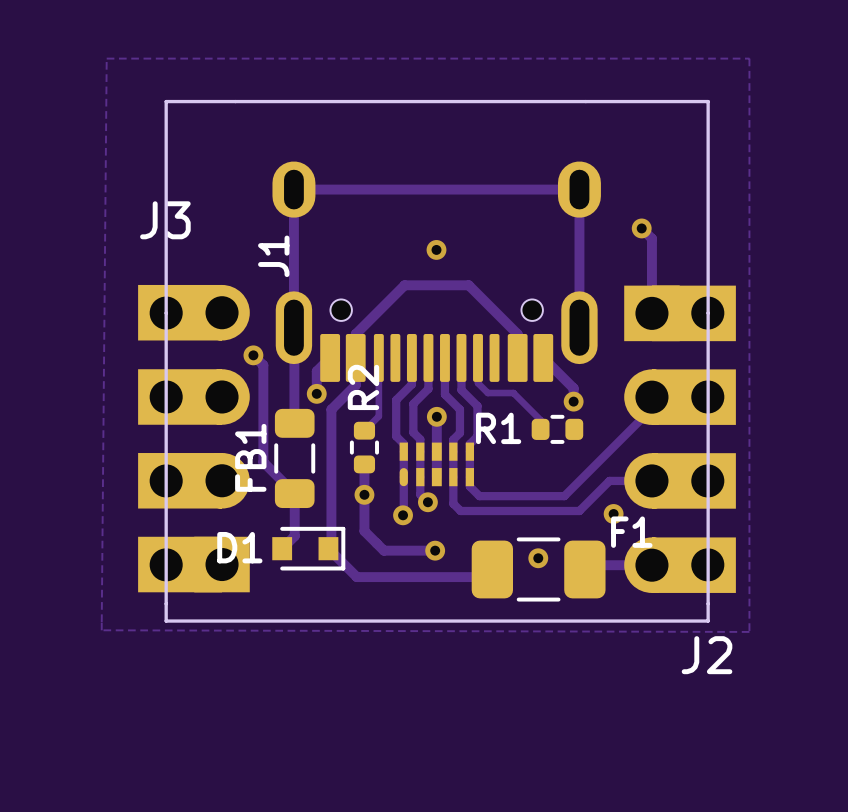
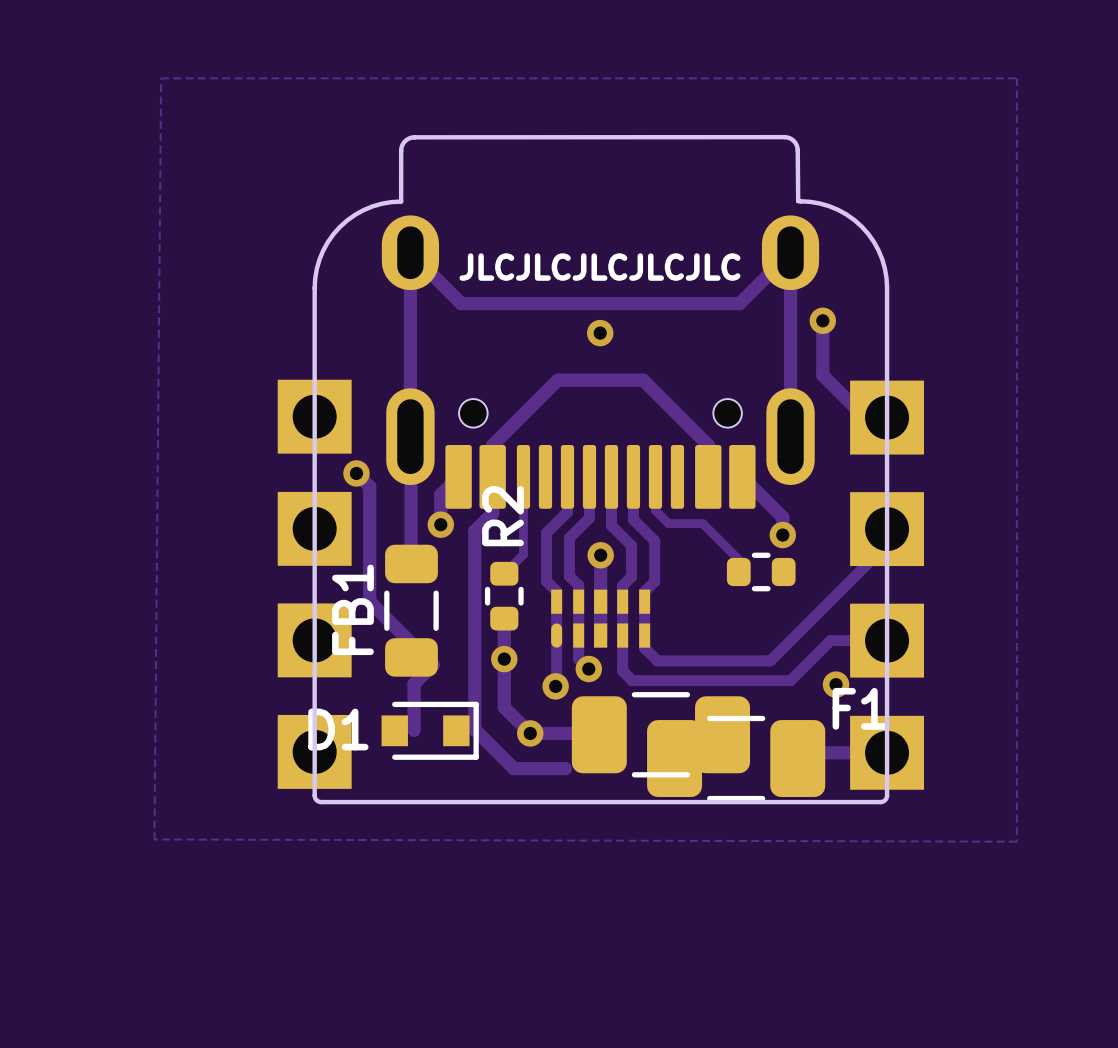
board edge: (166, 101) (166, 621) (708, 621) (708, 101) (166, 101) -> (414, 137) (406, 140) (401, 147) (401, 201) (372, 206) (347, 220) (327, 242) (319, 259) (315, 278) (316, 799) (321, 802) (884, 800) (887, 795) (887, 287) (884, 268) (873, 241) (861, 226) (838, 209) (819, 203) (798, 201) (797, 148) (793, 141) (787, 137) (414, 137)
track: (293, 189) (579, 189) -> (410, 252) (461, 303) (739, 303) (790, 252)
text: none -> JLCJLCJLCJLCJLC (599, 267)
track: (641, 228) (651, 238) (651, 313) -> (822, 320) (822, 375) (865, 417) (887, 417)
via position: (641, 228) -> (822, 320)
J1 name: J1 (273, 256) -> none
track: (342, 398) (331, 409) (331, 545) (328, 548) (356, 577) (371, 577) -> (474, 531) (474, 729) (513, 768)
R1 name: R1 (498, 428) -> none
J3: (193, 438) -> none
part: none -> (314, 584)
part: none -> (887, 585)
J2: (680, 439) -> none
track: (263, 451) (263, 462) (294, 493) (294, 536) (282, 548) -> (369, 601) (433, 664) (414, 683) (414, 730)
via position: (435, 550) -> (530, 733)
part: none -> (660, 734)
via: (538, 558) -> none
track: (492, 562) (477, 577) (410, 577) -> none

